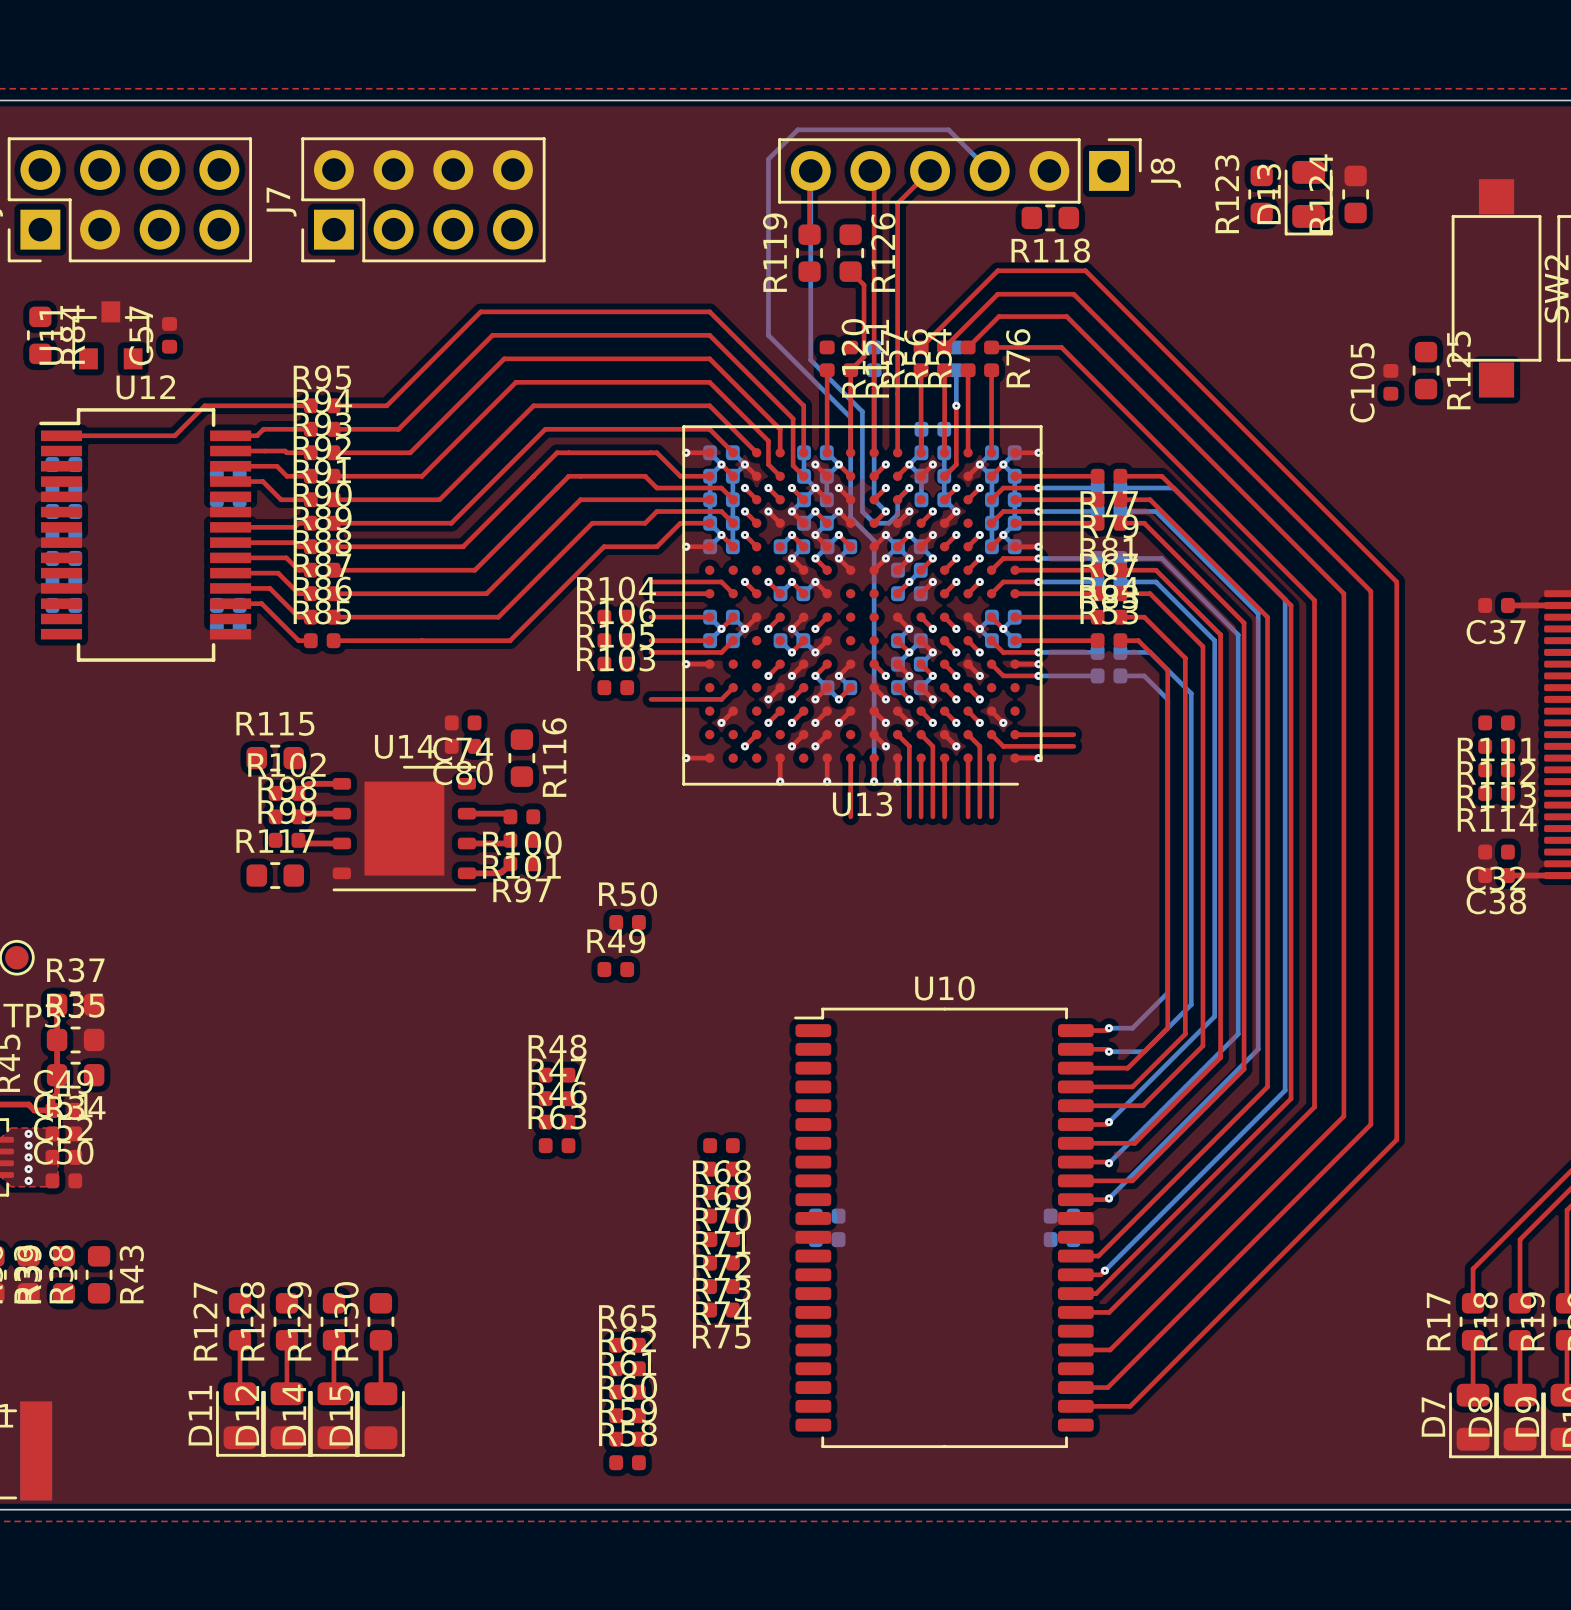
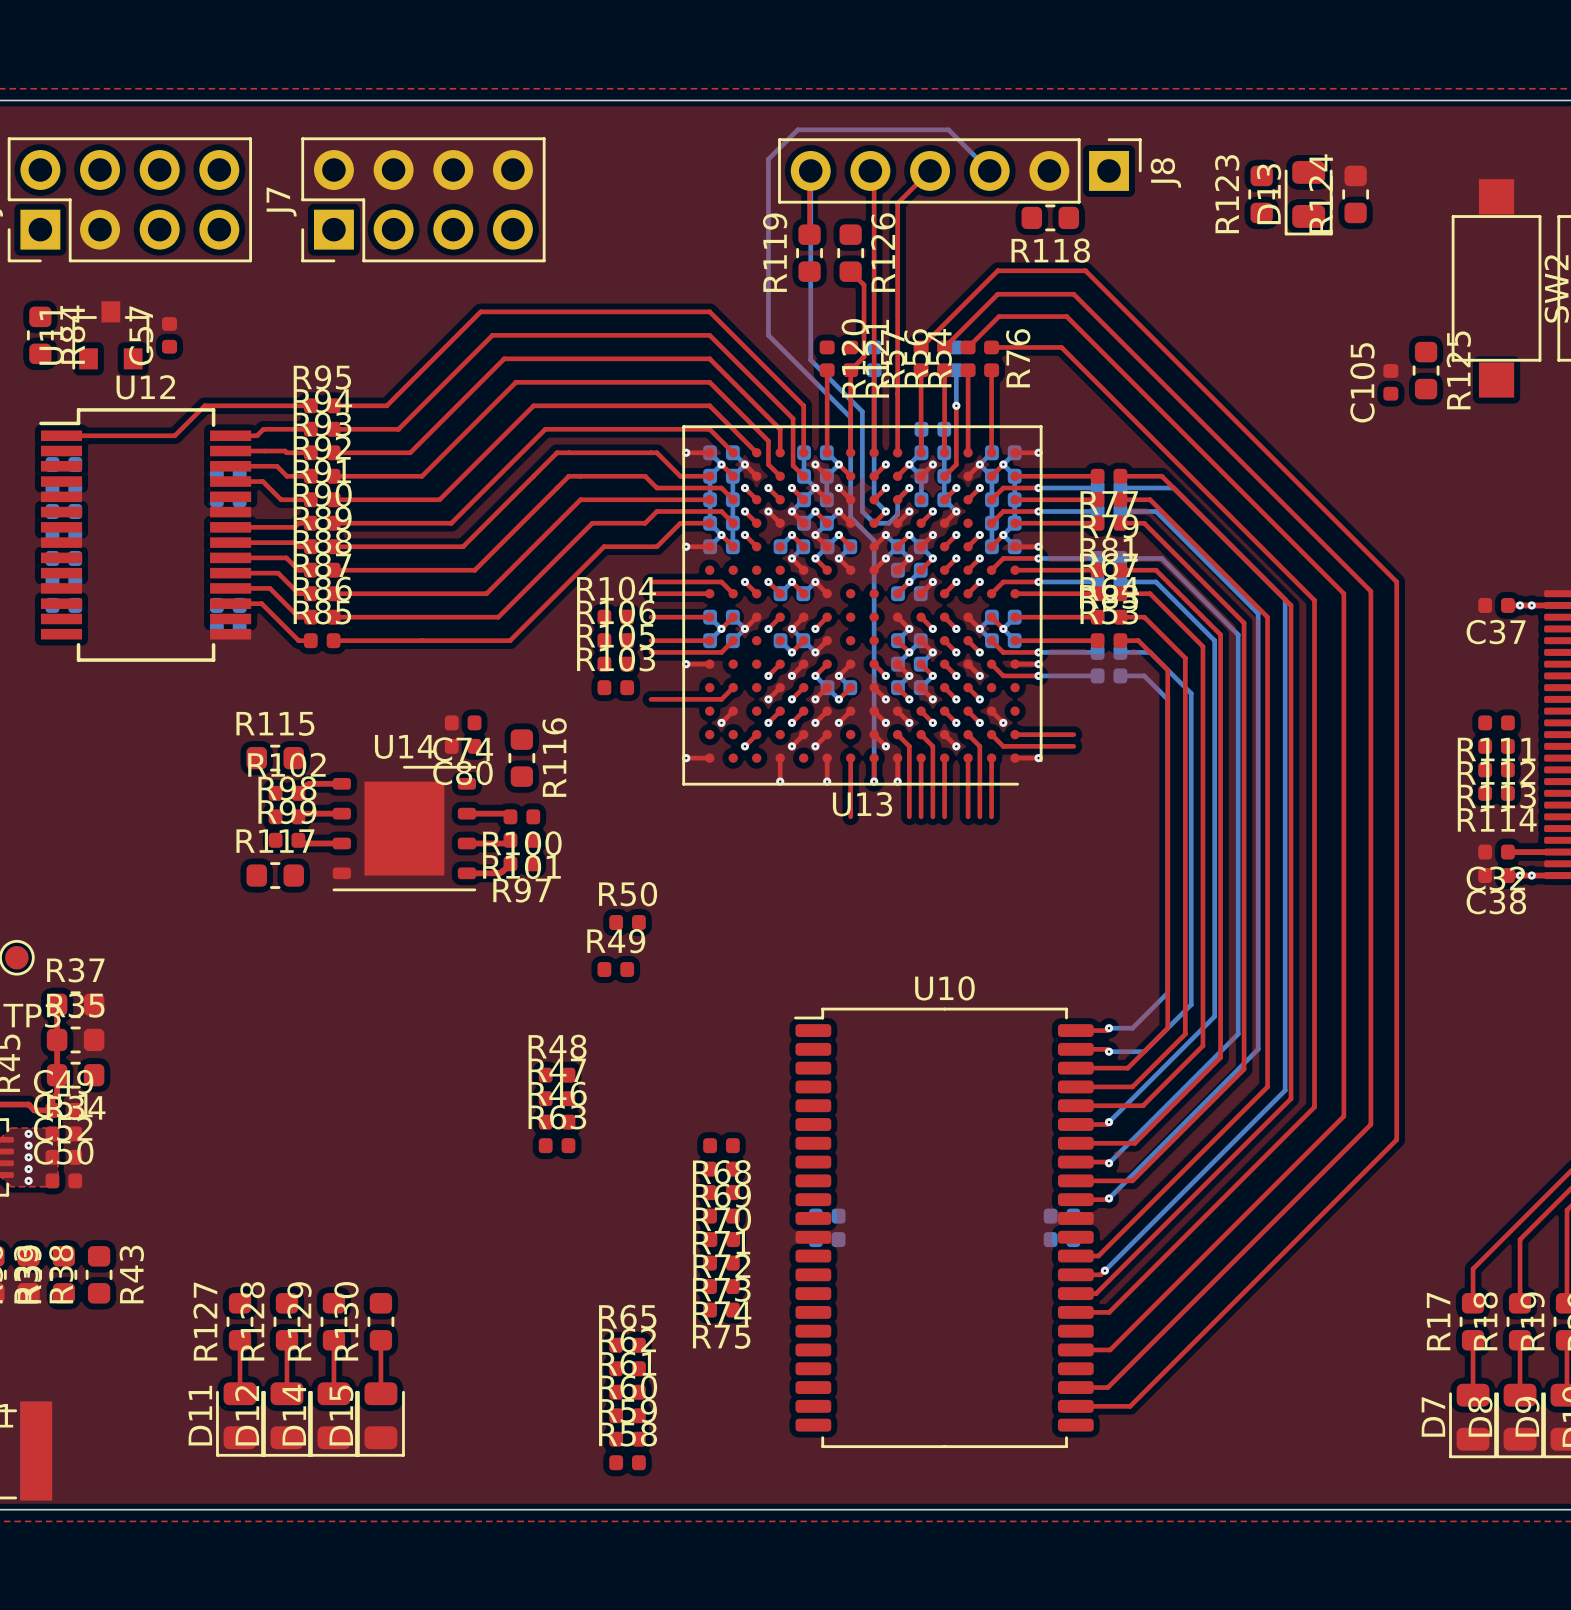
via: none -> (1520, 605)
via: none -> (1531, 605)
top track: none -> (1507, 852) (1562, 852)
via: none -> (1520, 875)
via: none -> (1531, 875)

